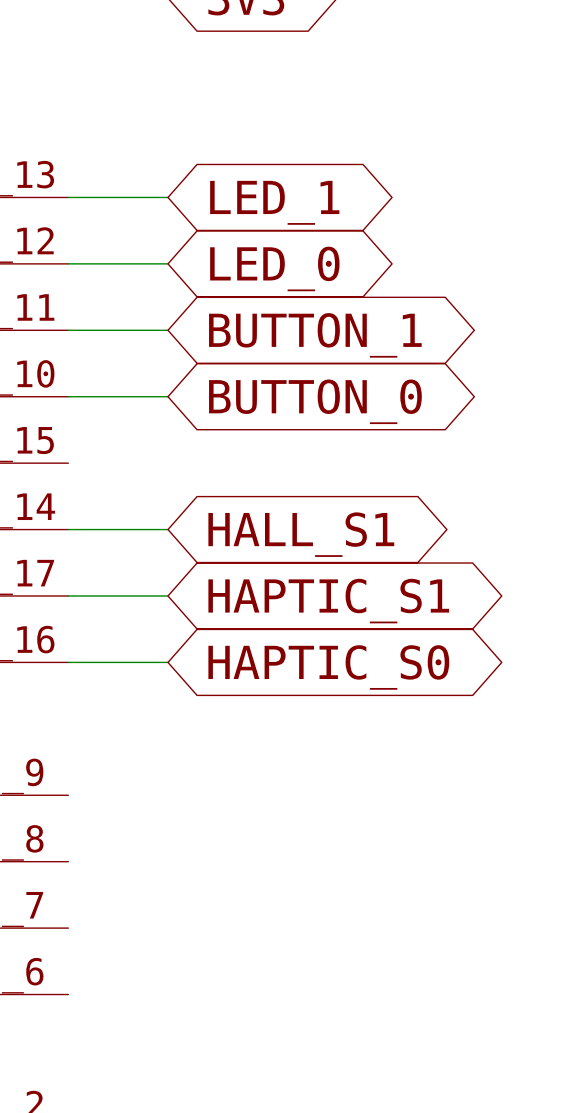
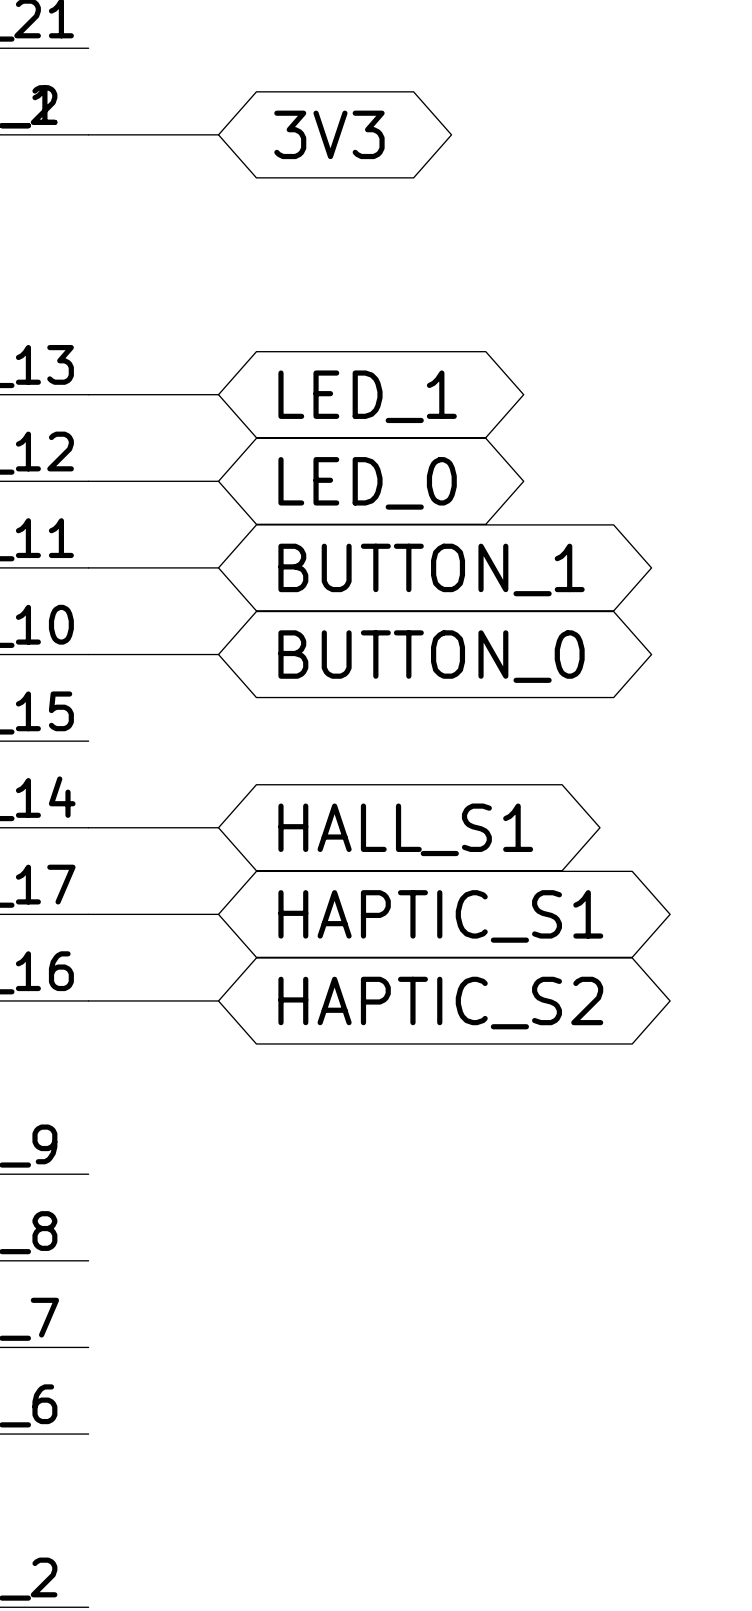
global label: HAPTIC_S0 (328, 667) -> HAPTIC_S2 (440, 1003)

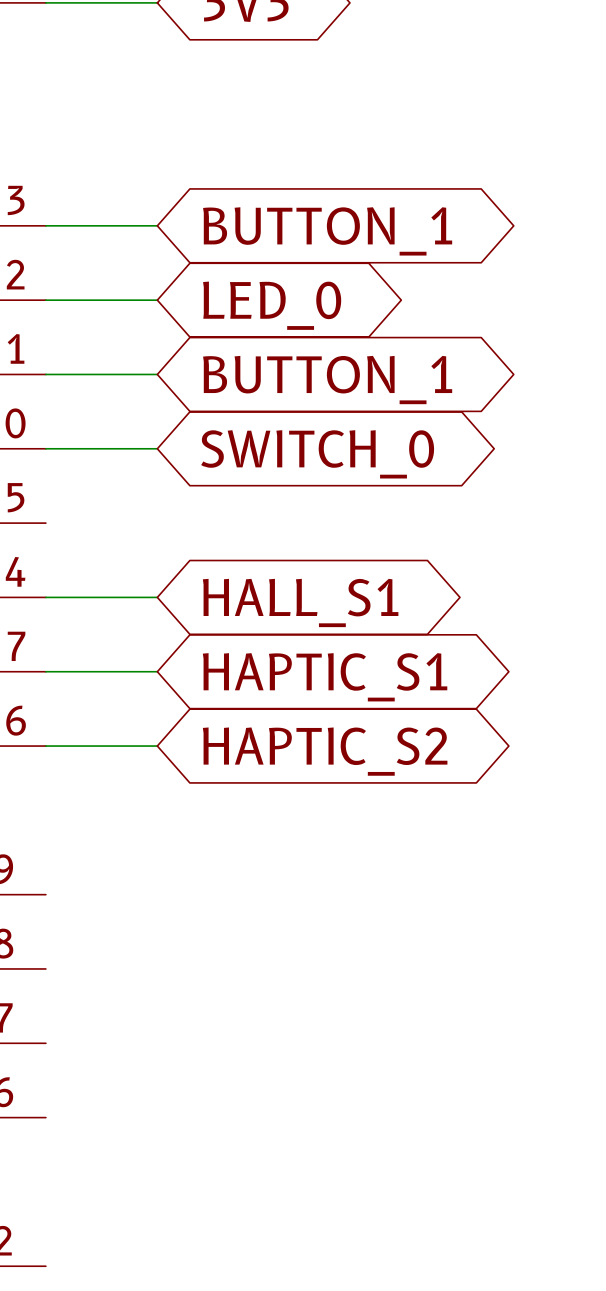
global label: LED_1 (367, 396) -> BUTTON_1 (327, 231)
global label: BUTTON_0 (431, 656) -> SWITCH_0 (317, 454)

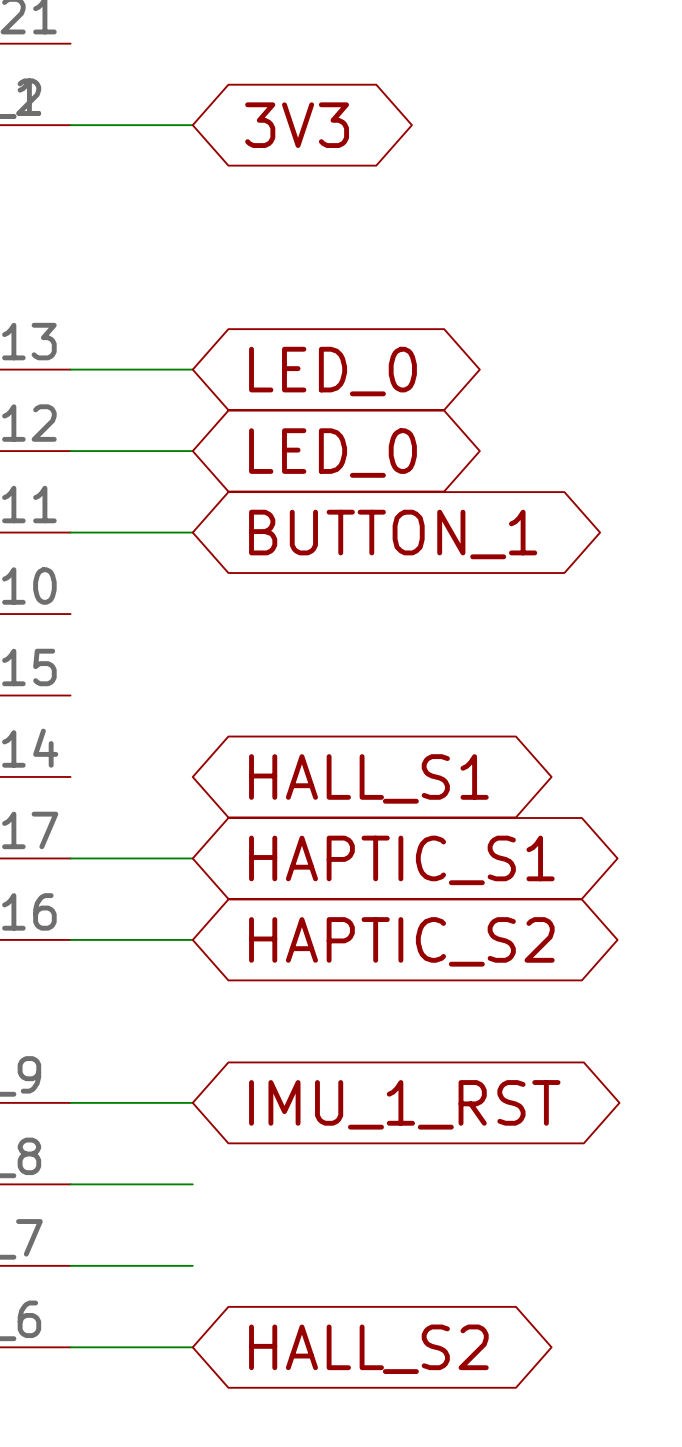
global label: BUTTON_1 (327, 231) -> LED_0 (332, 371)
wire: (45, 448) (157, 448) -> (70, 1102) (192, 1102)
global label: SWITCH_0 (317, 454) -> none
wire: (45, 597) (157, 597) -> (70, 1265) (192, 1265)
global label: none -> IMU_1_RST (404, 1104)
wire: none -> (70, 1184) (192, 1184)
wire: none -> (70, 1347) (192, 1347)
global label: none -> HALL_S2 (368, 1349)

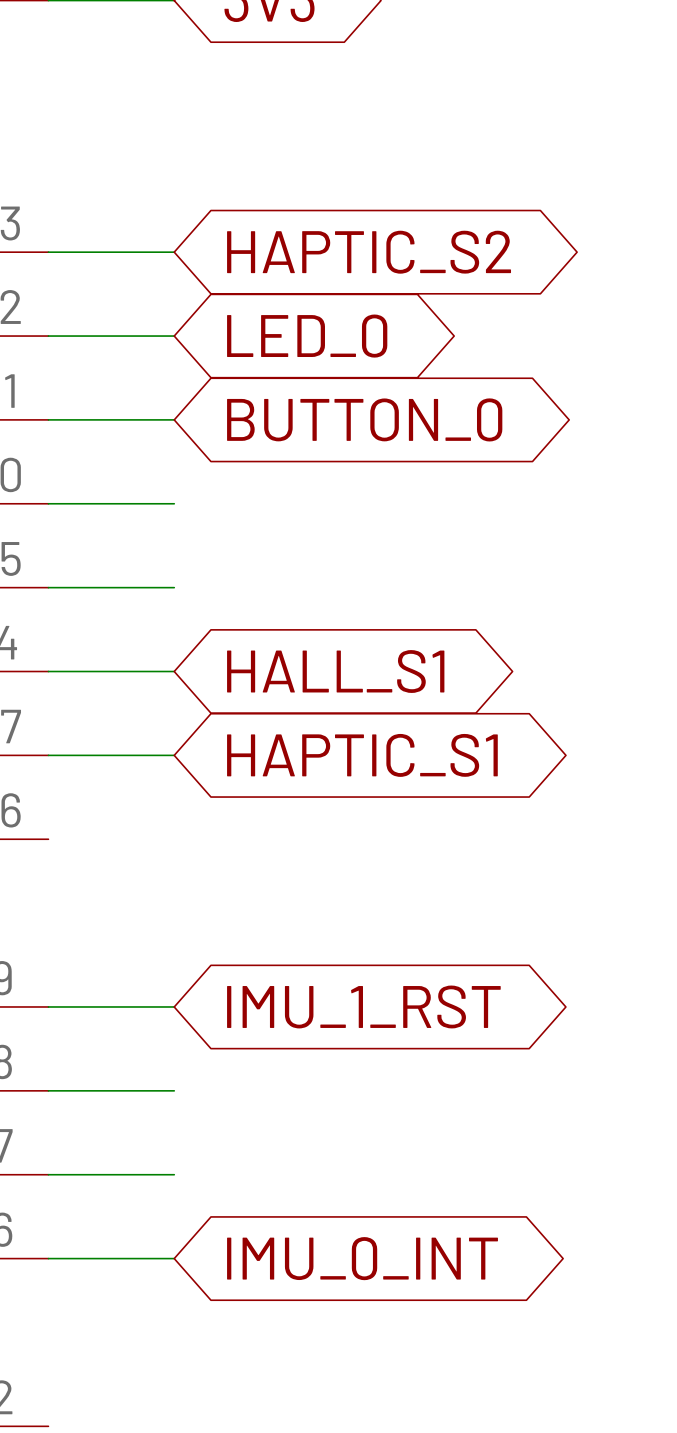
global label: LED_0 (332, 371) -> HAPTIC_S2 (369, 252)
global label: BUTTON_1 (393, 534) -> BUTTON_0 (364, 419)
wire: none -> (48, 503) (174, 503)
wire: none -> (48, 587) (174, 587)
wire: (70, 939) (192, 939) -> (48, 671) (174, 671)
global label: HAPTIC_S2 (401, 941) -> none
global label: HALL_S2 (368, 1349) -> IMU_0_INT (362, 1258)

